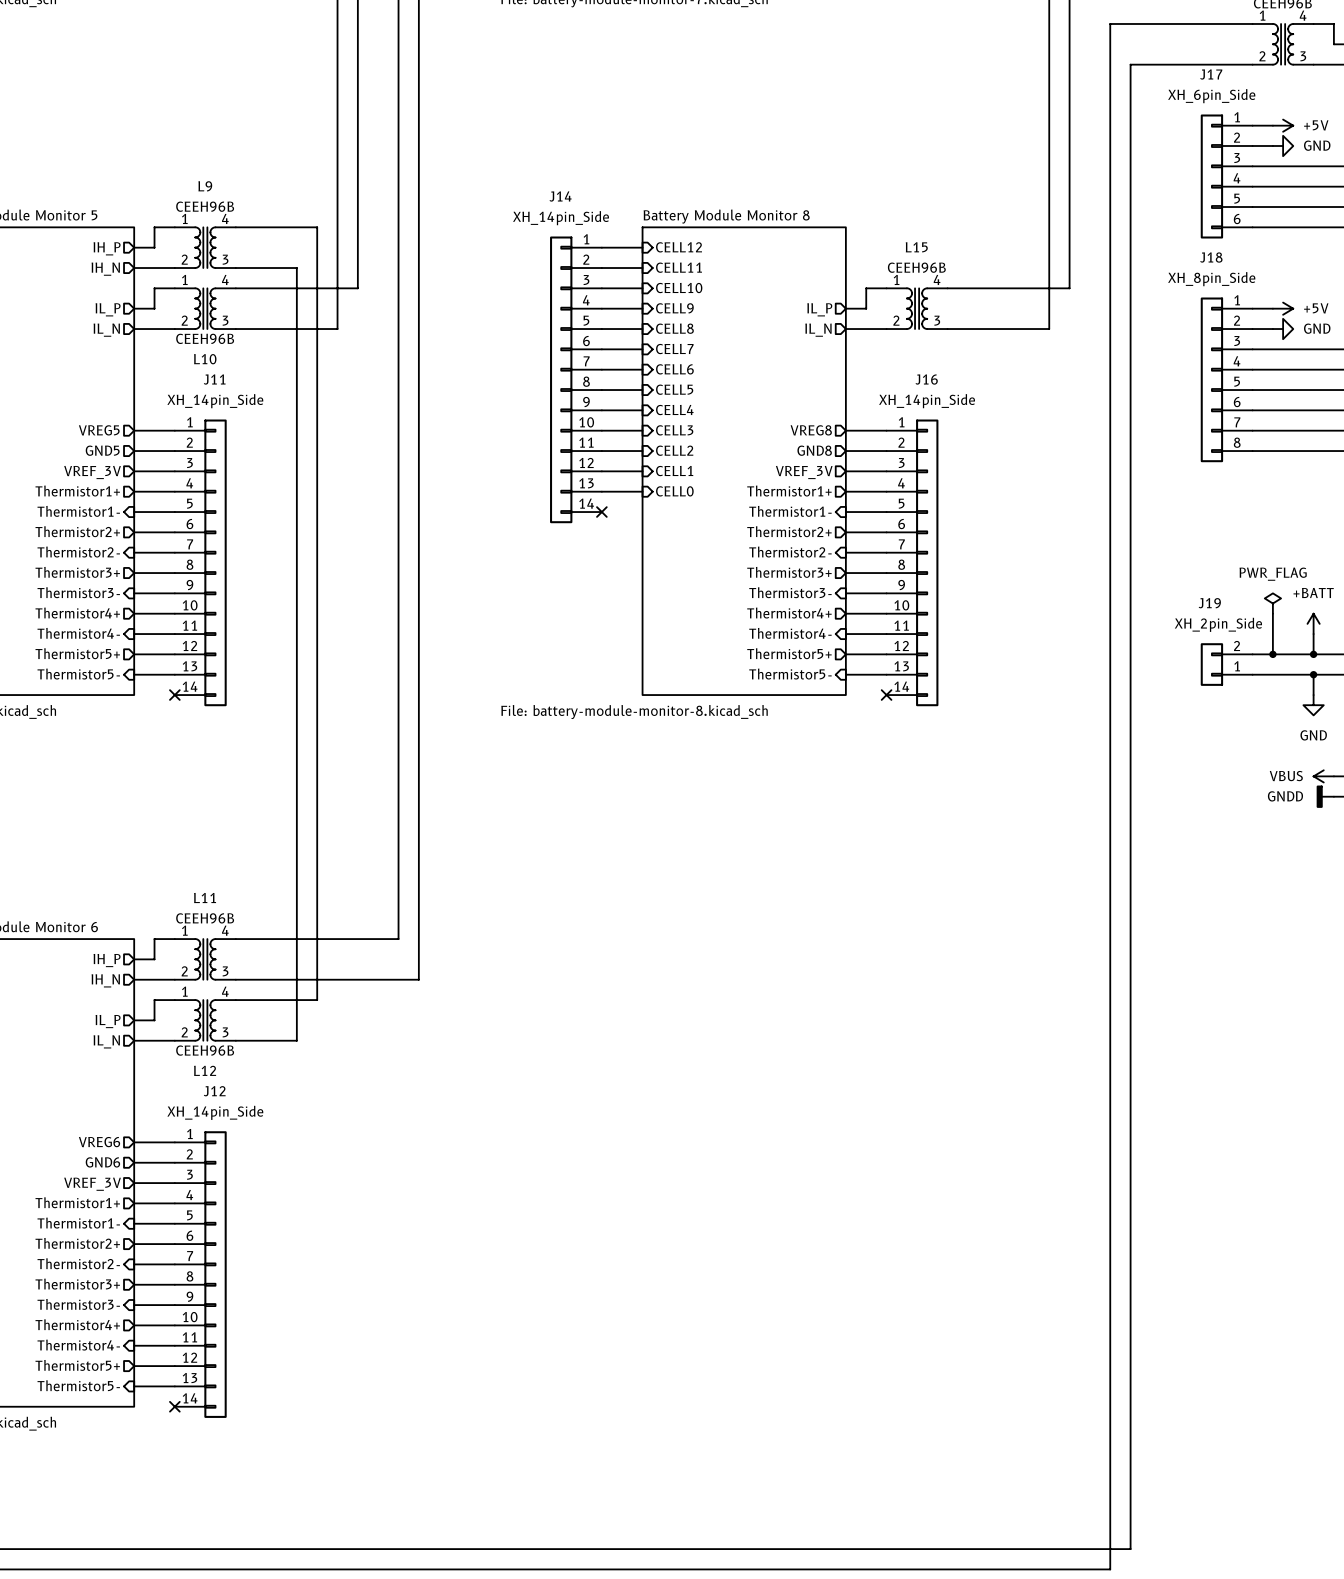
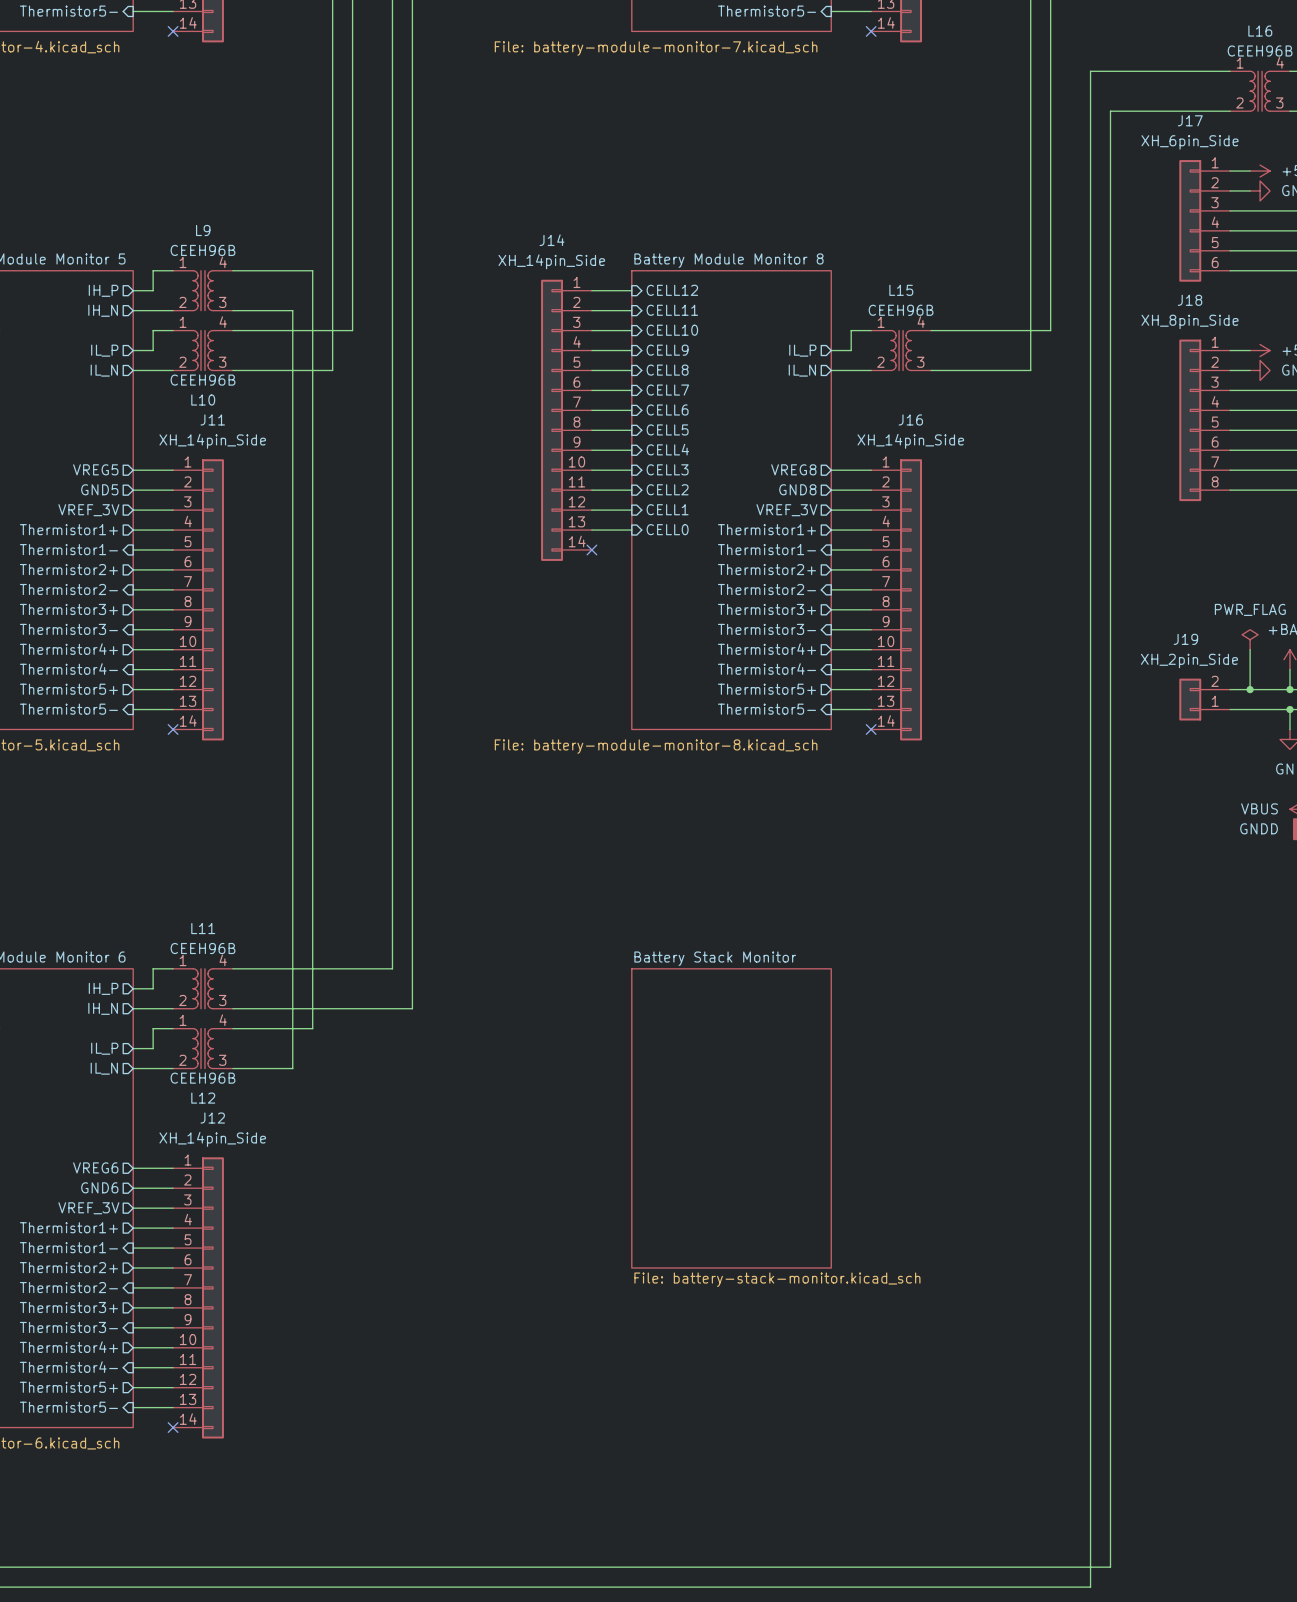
sheet Battery Stack Monitor: none -> File: battery-stack-monitor.kicad_sch (731, 1118)

